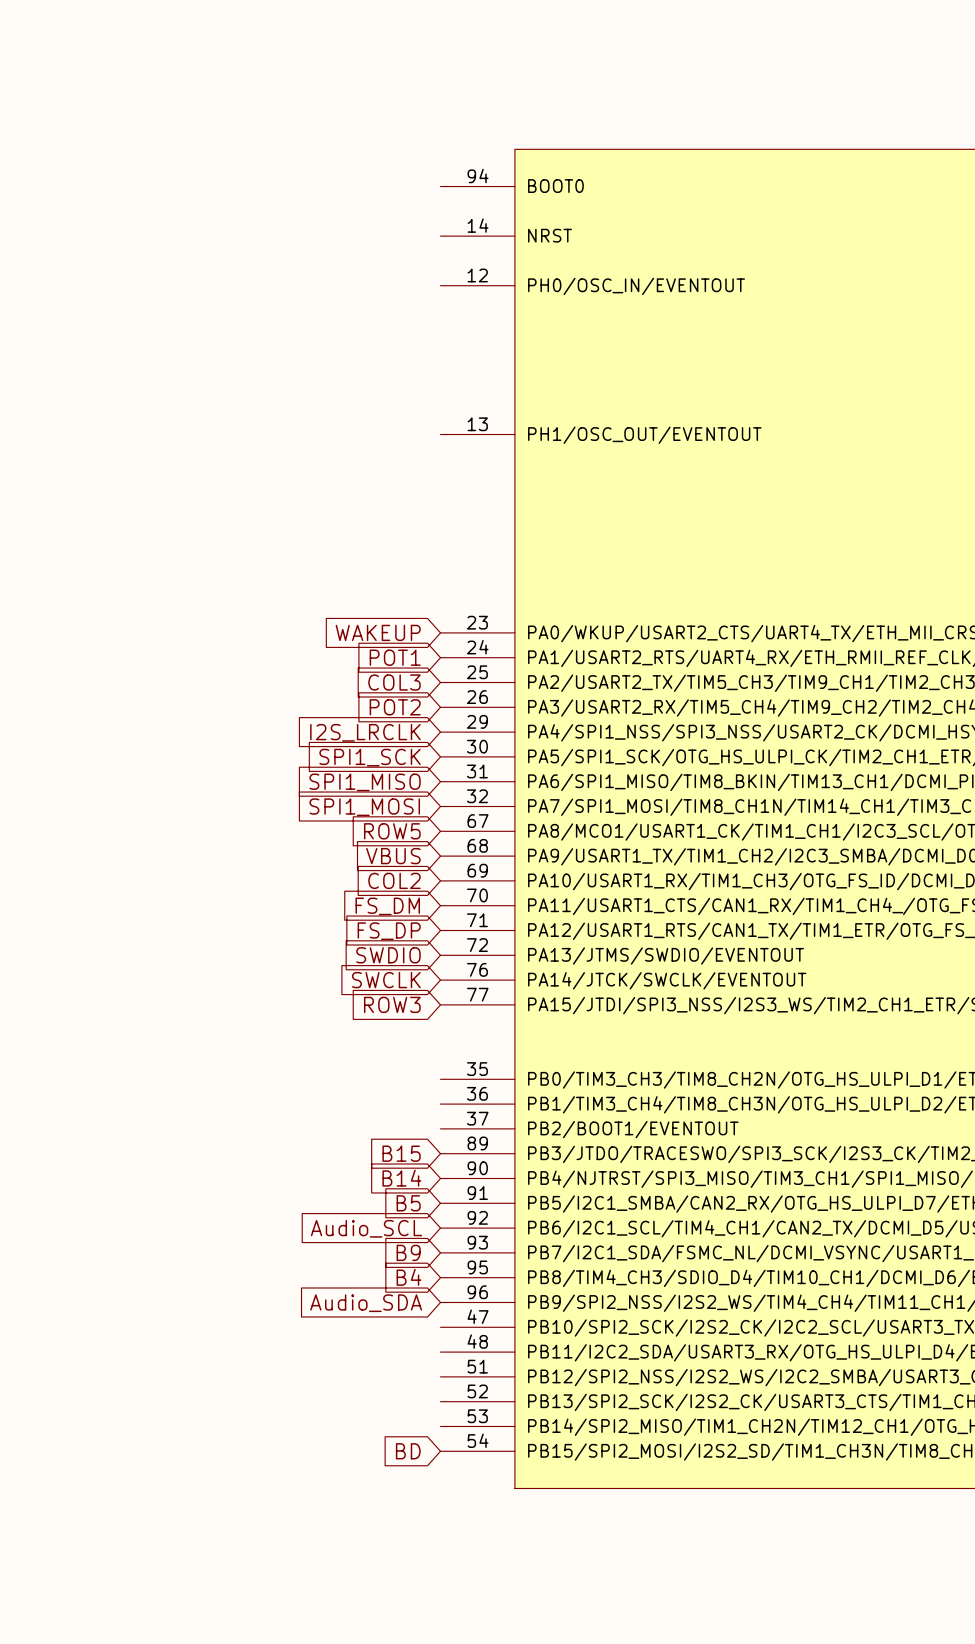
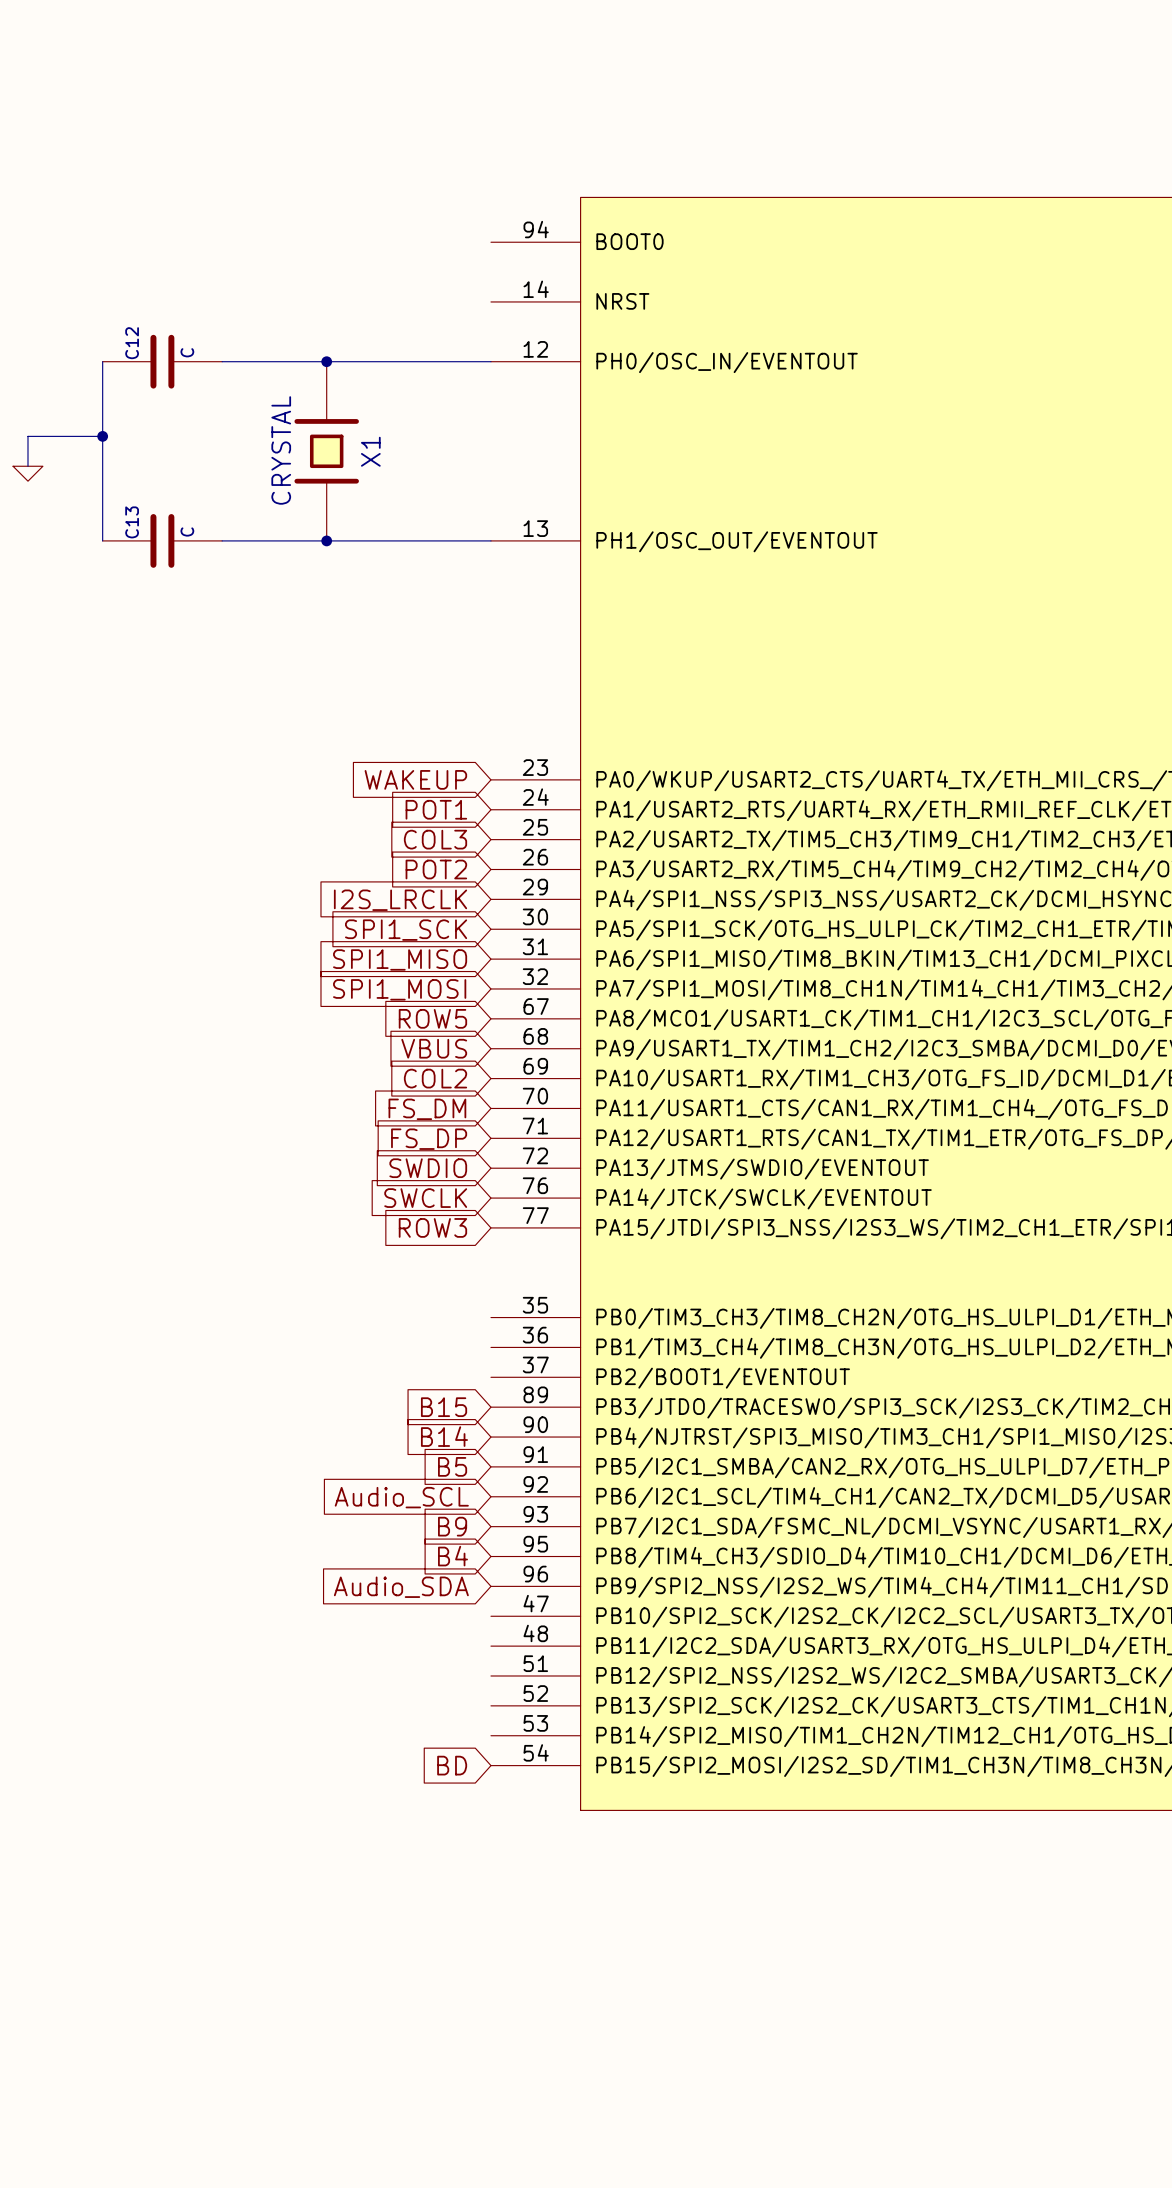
wire: none -> (102, 361) (102, 540)
C12: none -> C (162, 361)
wire: none -> (222, 361) (490, 361)
junction: none -> (326, 361)
wire: none -> (102, 436) (27, 436) (27, 466)
junction: none -> (102, 436)
X1: none -> CRYSTAL (326, 451)
power symbol: none -> (27, 473)
C13: none -> C (162, 540)
wire: none -> (222, 540) (490, 540)
junction: none -> (326, 540)

